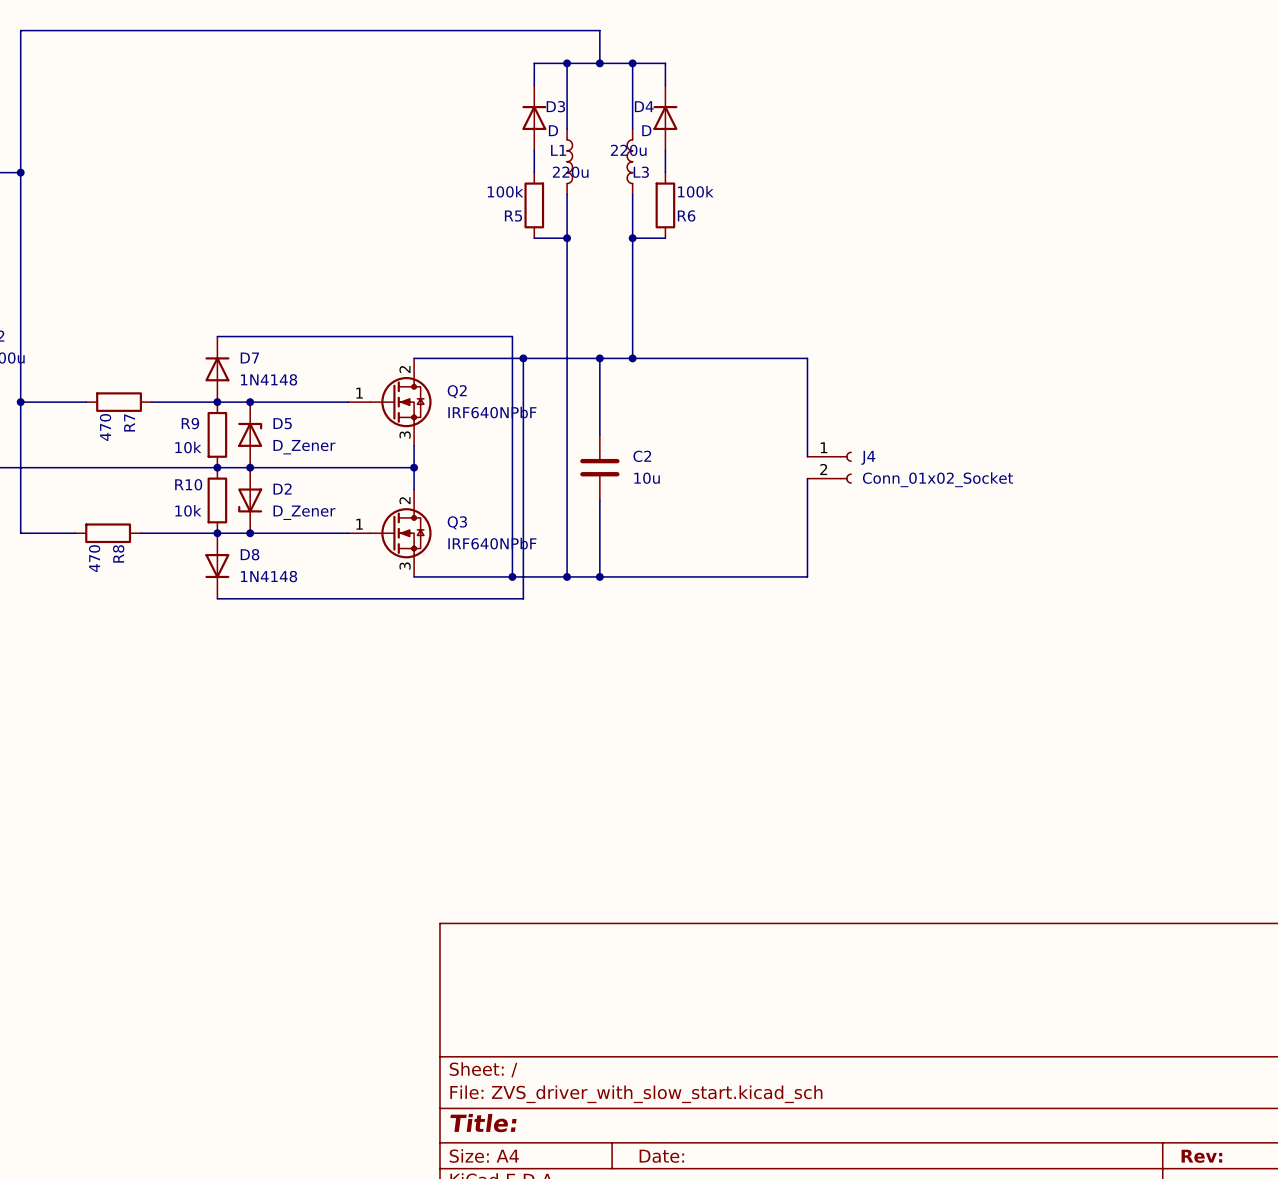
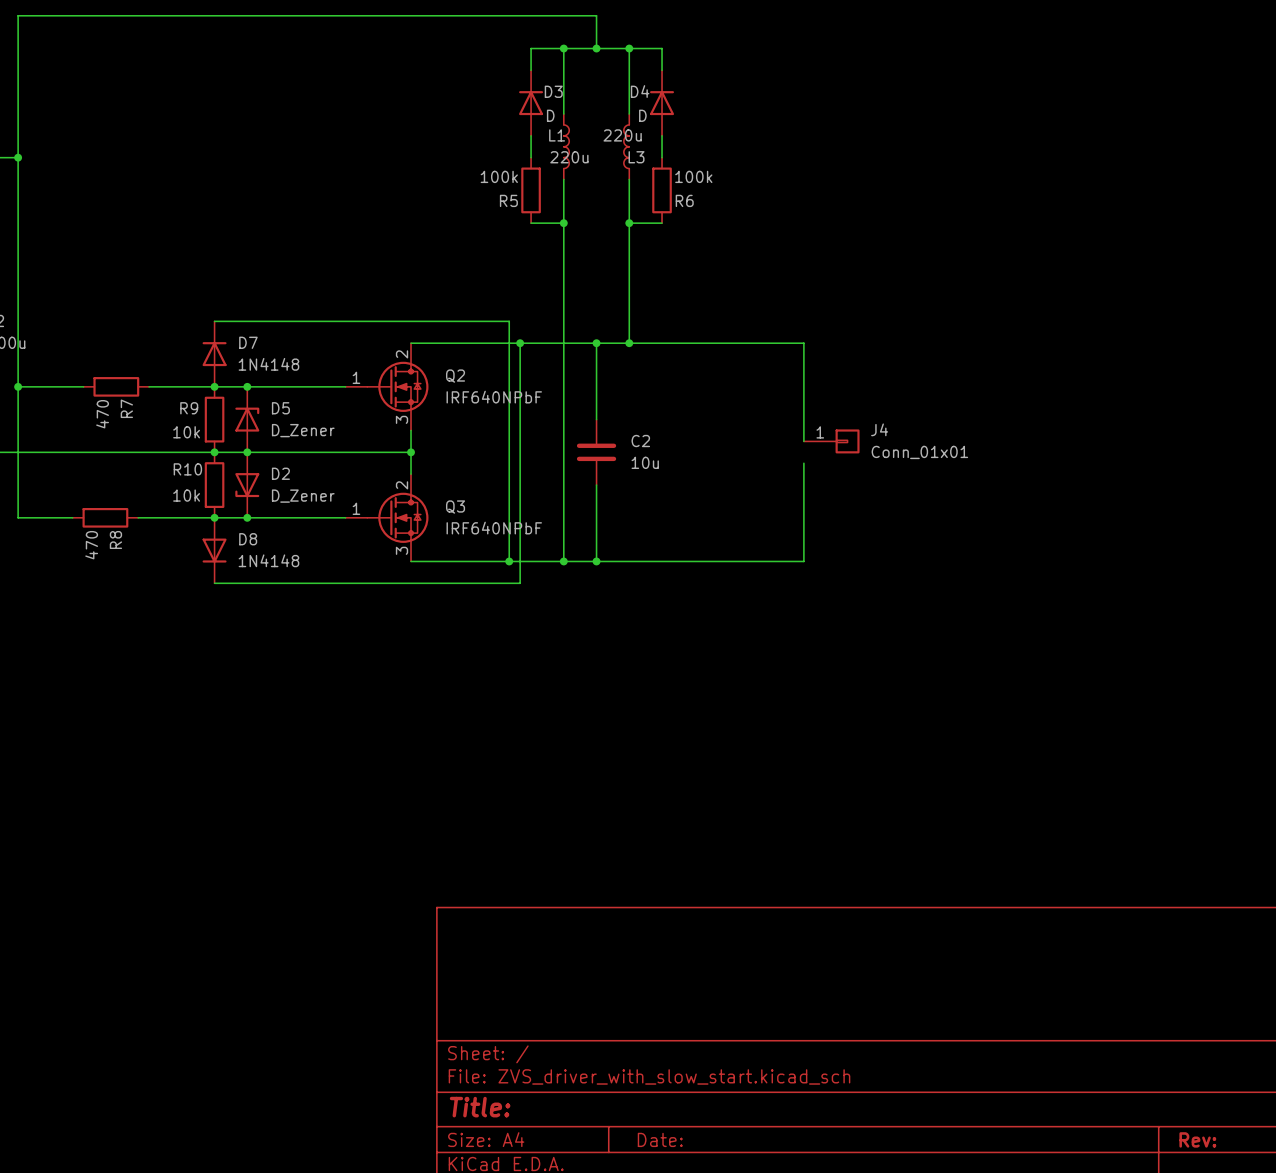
J4 symbol: [807, 451, 852, 484] -> [803, 429, 860, 454]
J4 value: Conn_01x02_Socket (938, 479) -> Conn_01x01 (919, 452)

